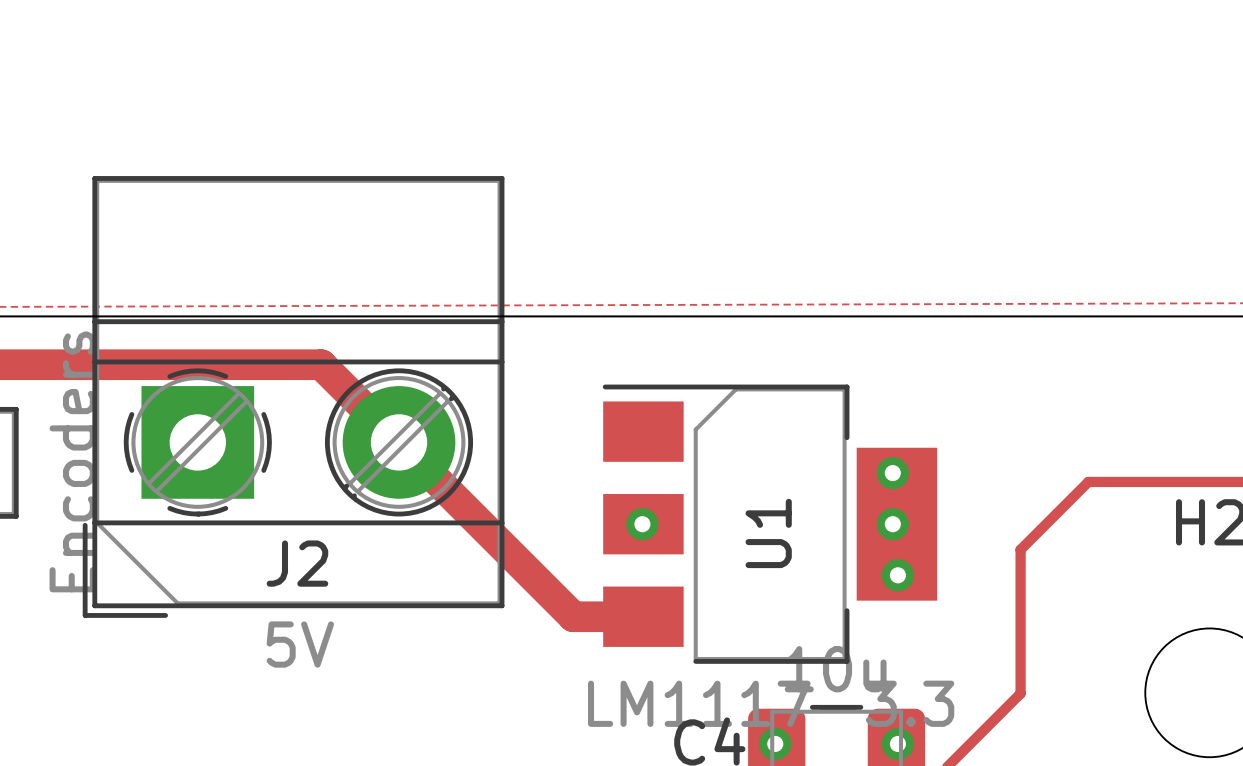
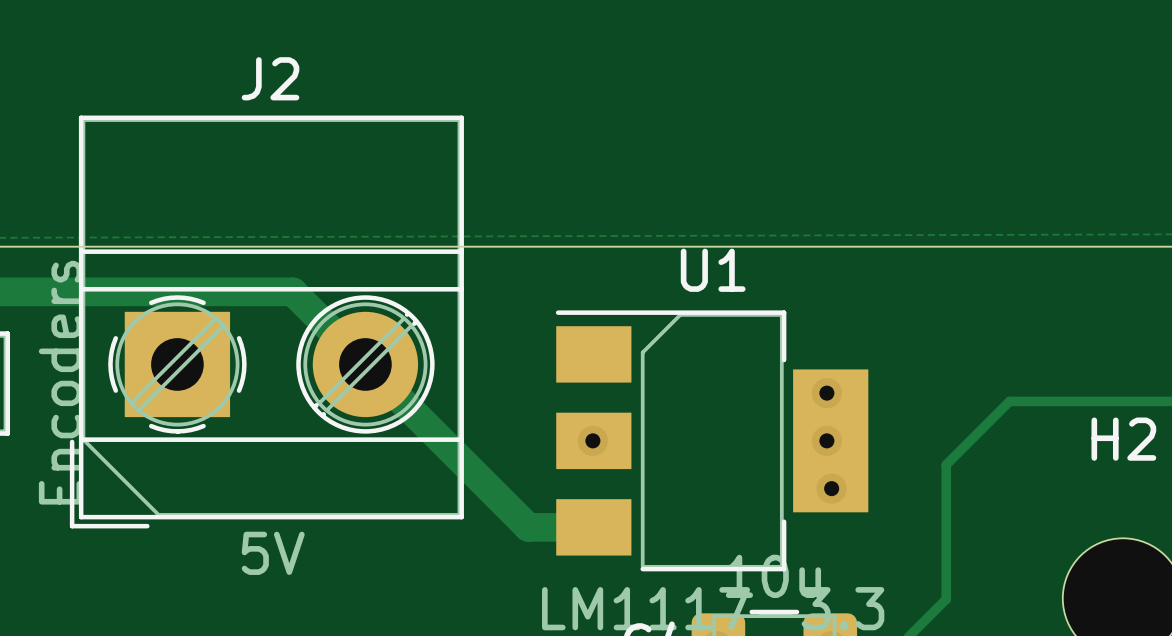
U1 name rotation: 0° (768, 533) -> 90° clockwise (713, 270)
U1 name position: U1 (768, 533) -> U1 (713, 270)
J2 name position: J2 (297, 563) -> J2 (270, 78)

